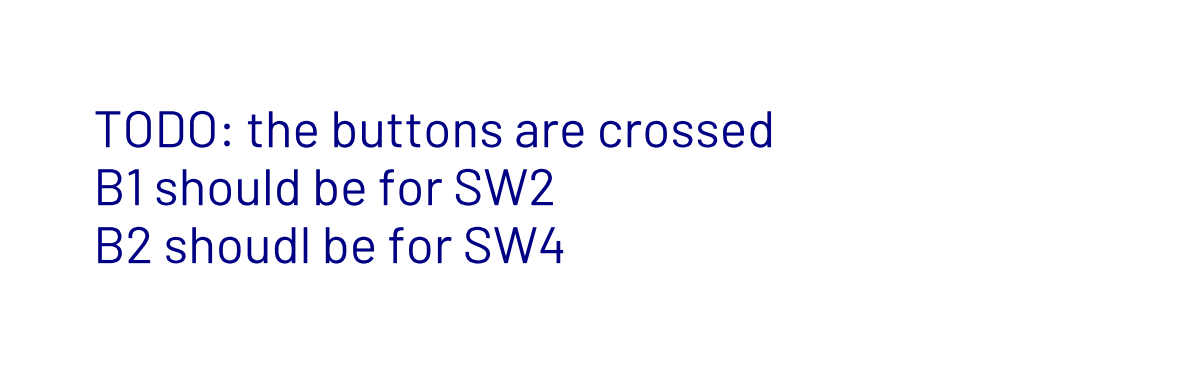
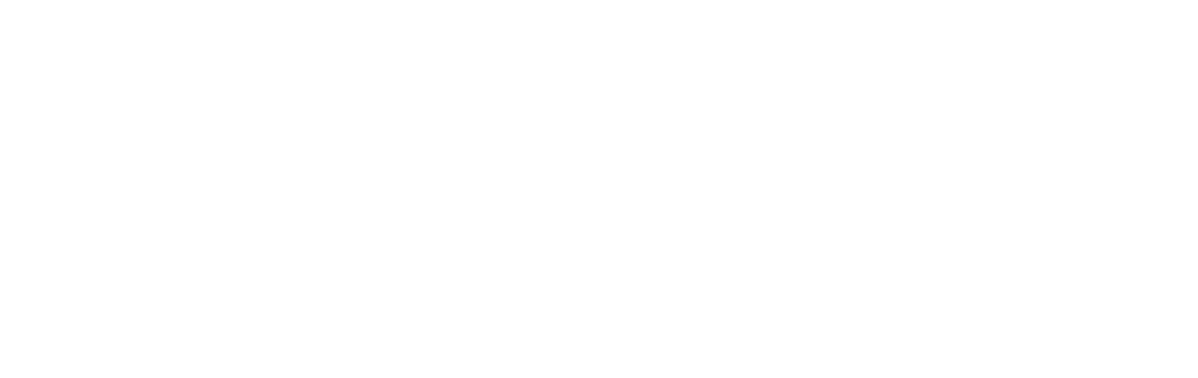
text: TODO: the buttons are crossed (433, 129) -> none
text: B1 should be for SW2 (325, 187) -> none
text: B2 shoudl be for SW4 (330, 245) -> none

